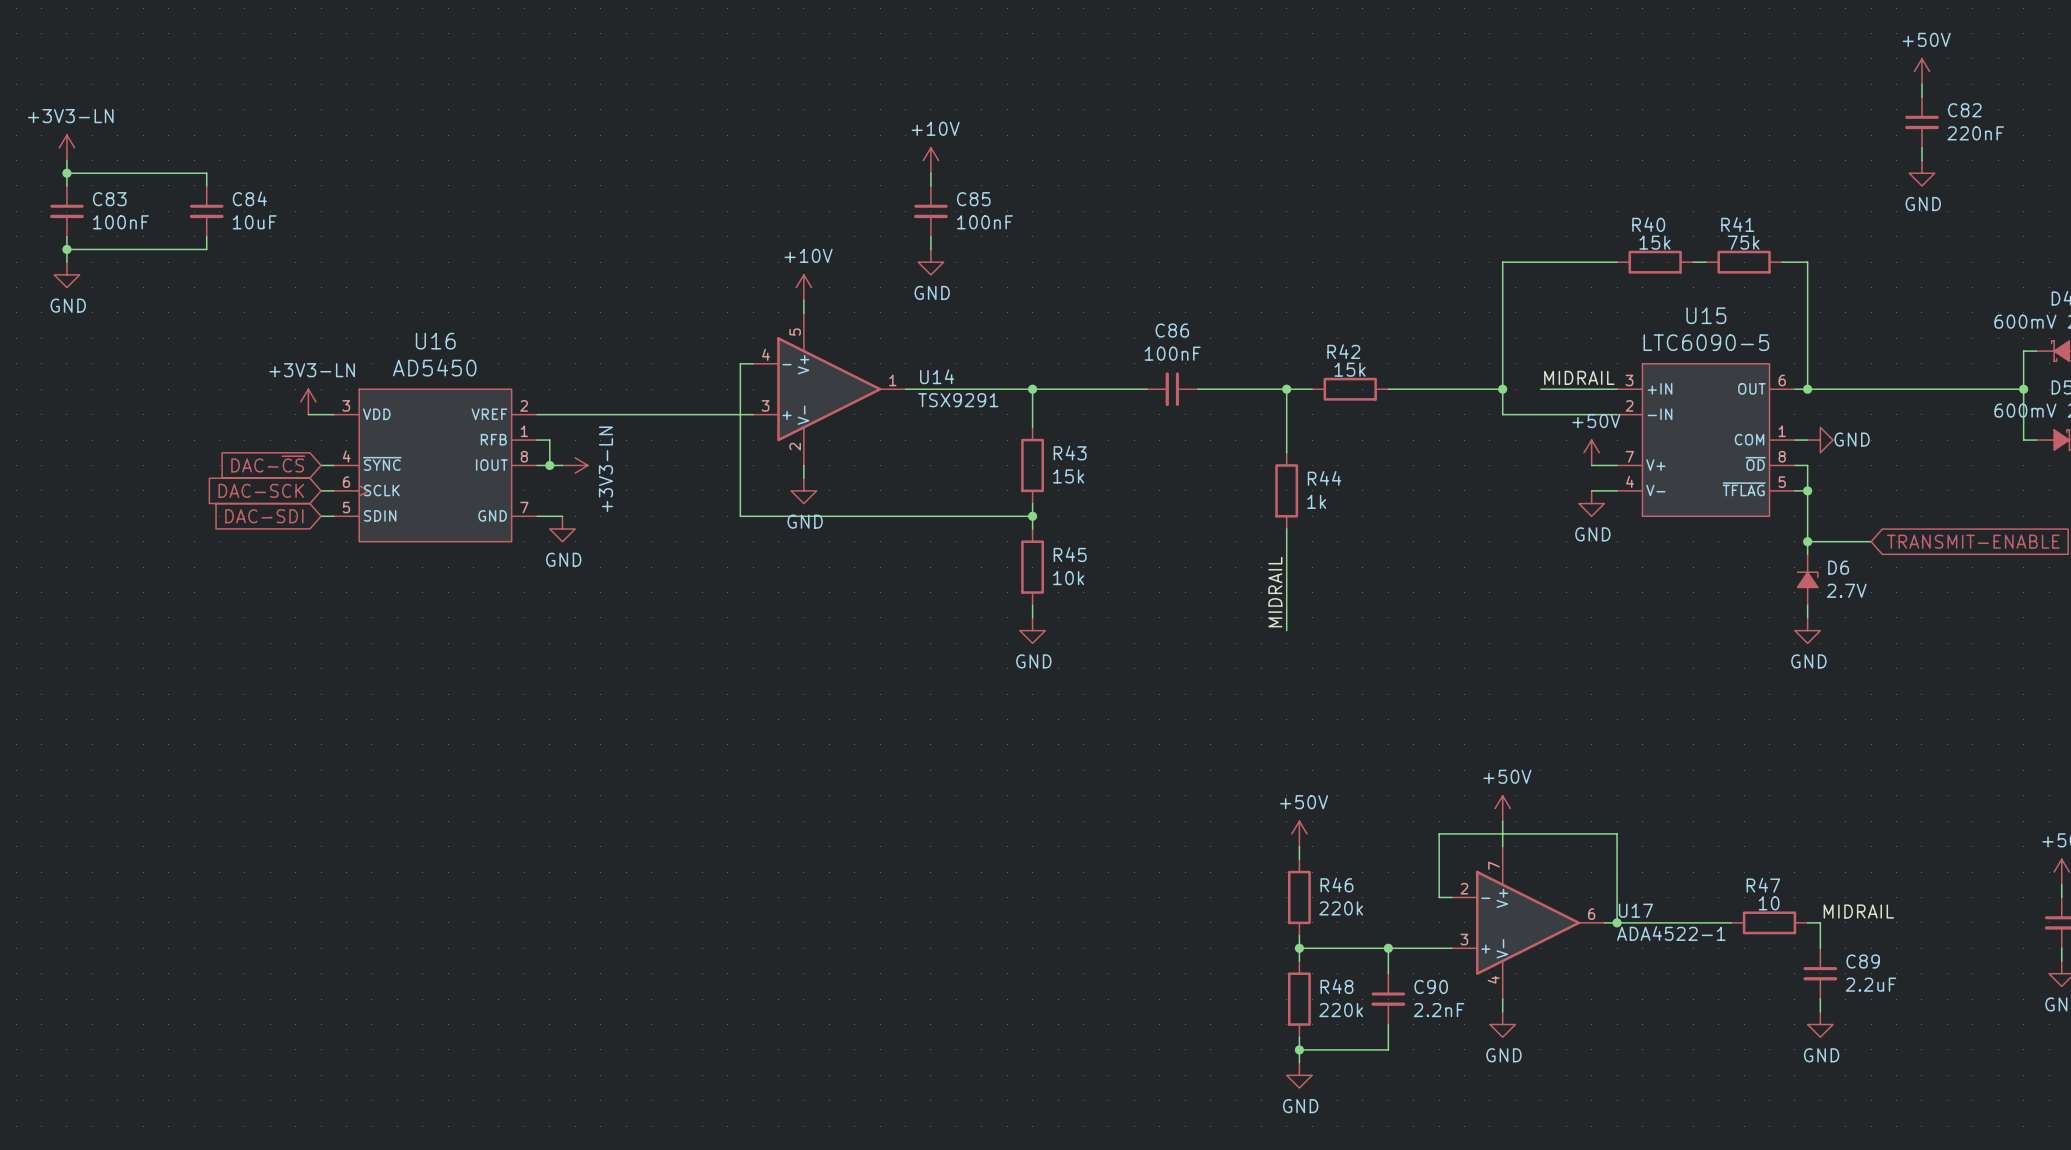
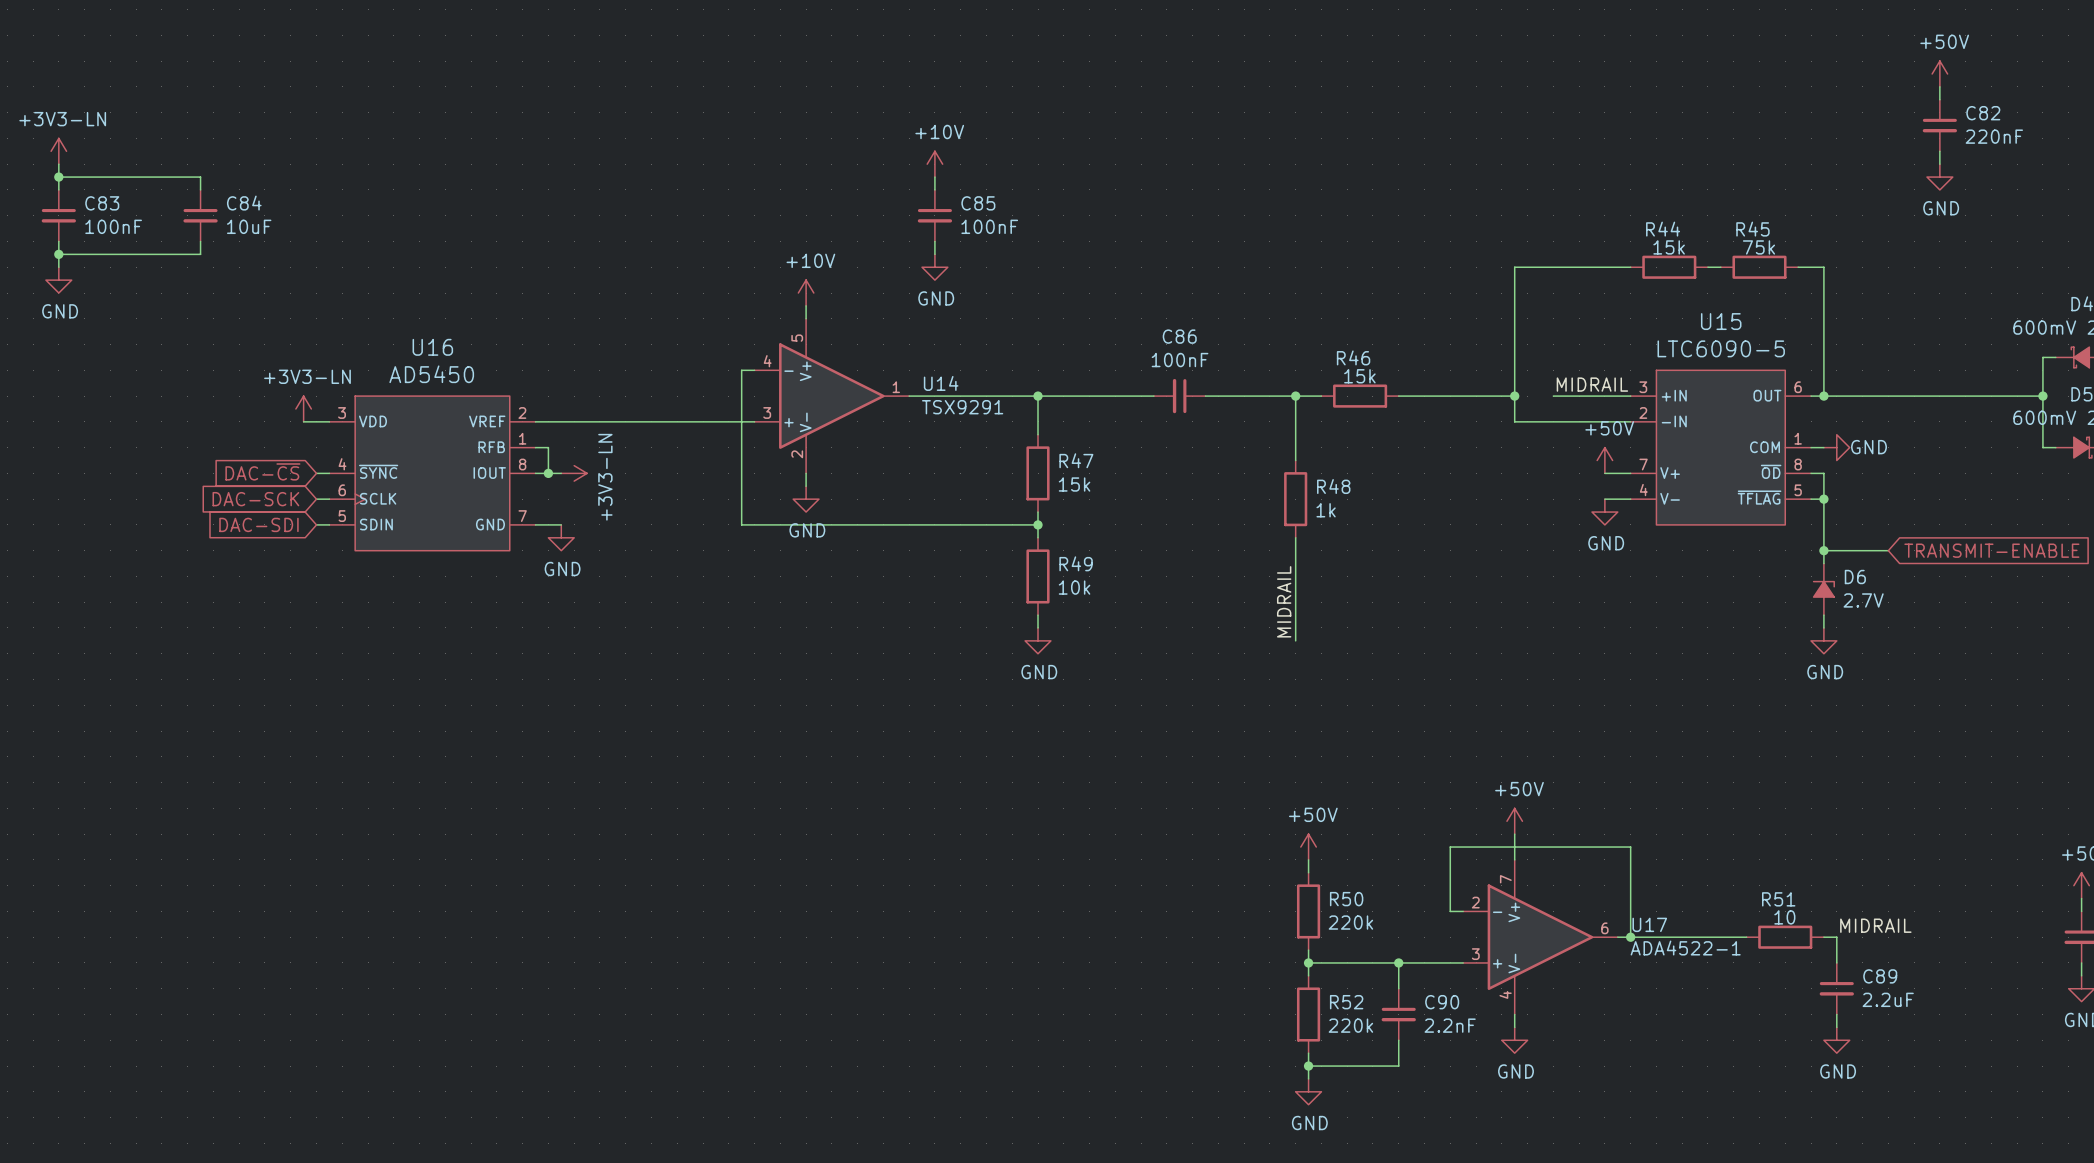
R40 name: R40 (1648, 224) -> R44 (1663, 229)
R41 name: R41 (1737, 224) -> R45 (1752, 229)
R42 name: R42 (1343, 351) -> R46 (1353, 357)
R43 name: R43 (1070, 452) -> R47 (1076, 460)
R44 name: R44 (1324, 478) -> R48 (1333, 486)
R45 name: R45 (1070, 554) -> R49 (1076, 563)
R46 name: R46 (1336, 884) -> R50 (1346, 899)
R47 name: R47 (1763, 885) -> R51 (1778, 899)
R48 name: R48 (1336, 986) -> R52 (1346, 1002)

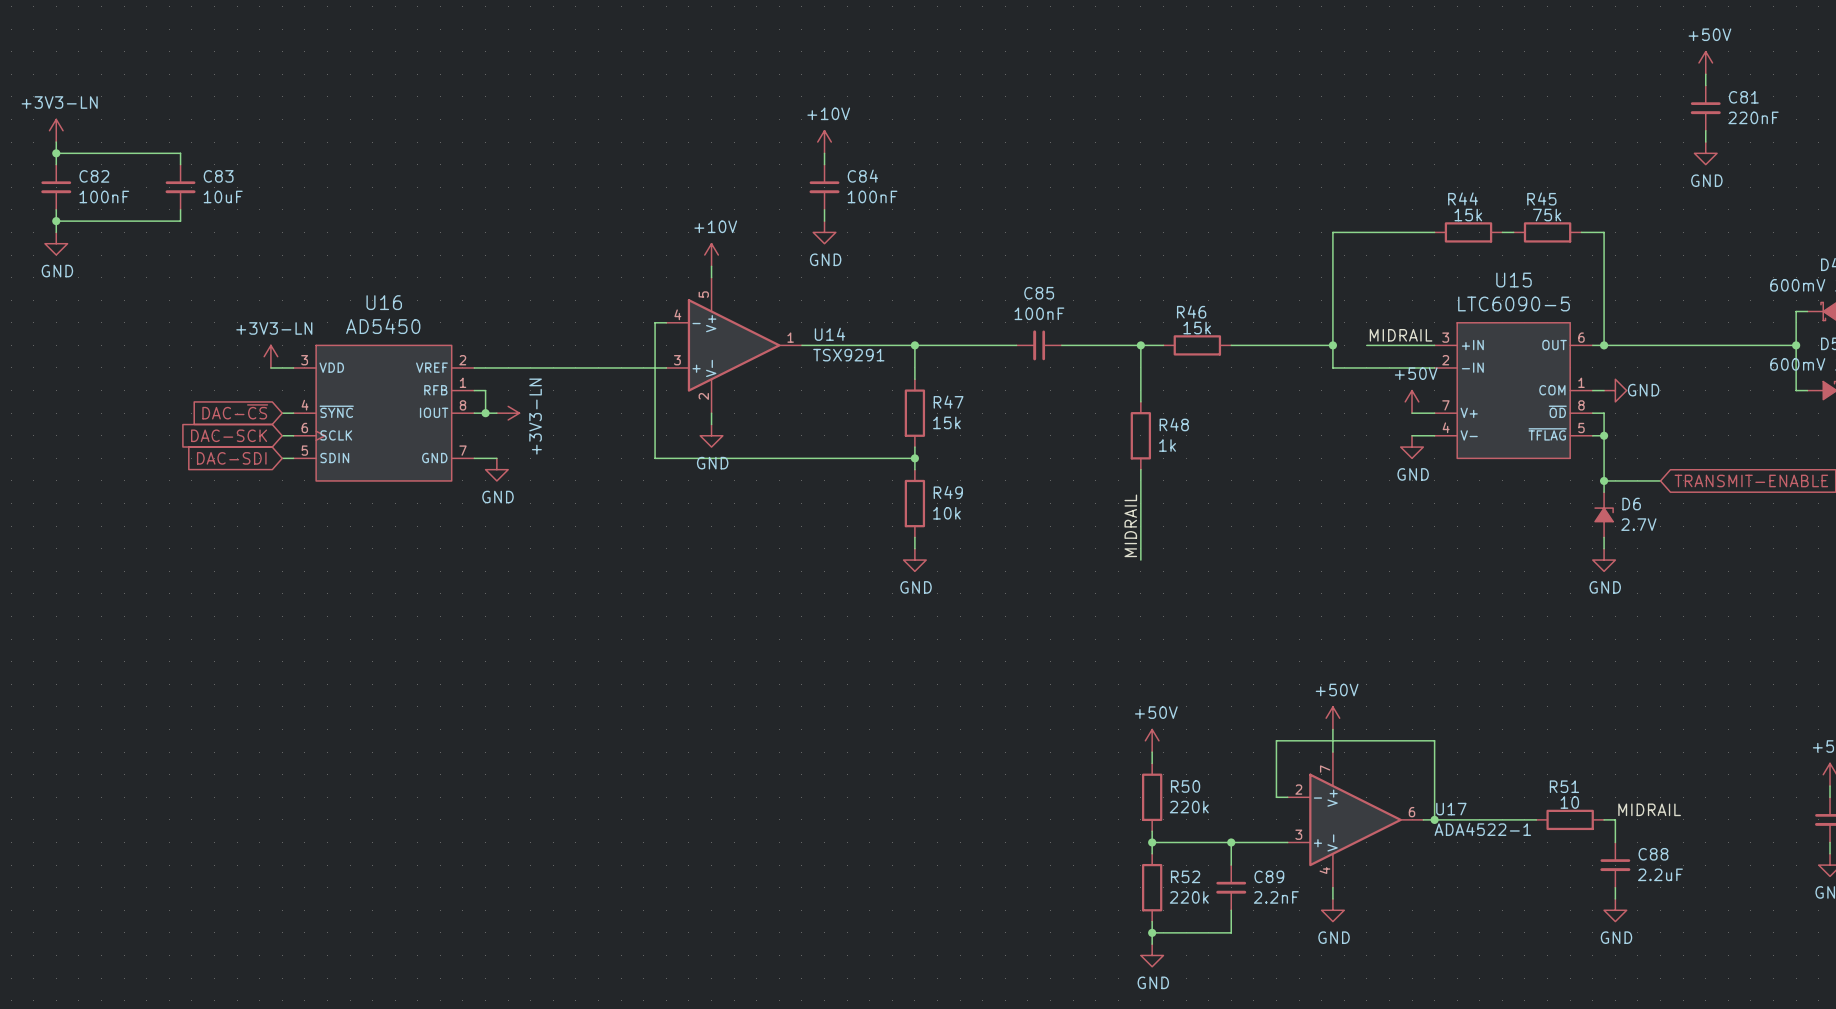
C82 name: C82 (1983, 113) -> C81 (1743, 97)
C83 name: C83 (102, 203) -> C82 (94, 176)
C84 name: C84 (244, 203) -> C83 (218, 176)
C85 name: C85 (978, 203) -> C84 (862, 176)
C86 name: C86 (1179, 336) -> C85 (1039, 293)
C89 name: C89 (1880, 976) -> C88 (1653, 854)
C90 name: C90 (1442, 1002) -> C89 (1269, 876)

